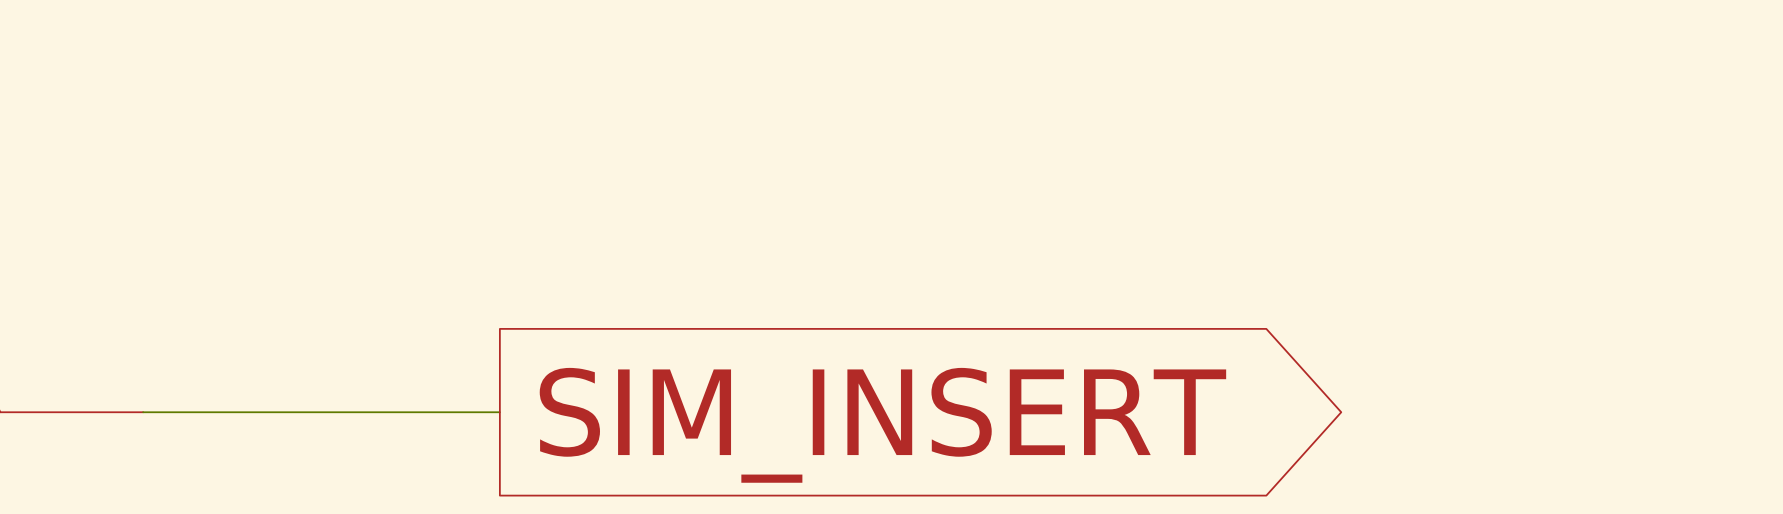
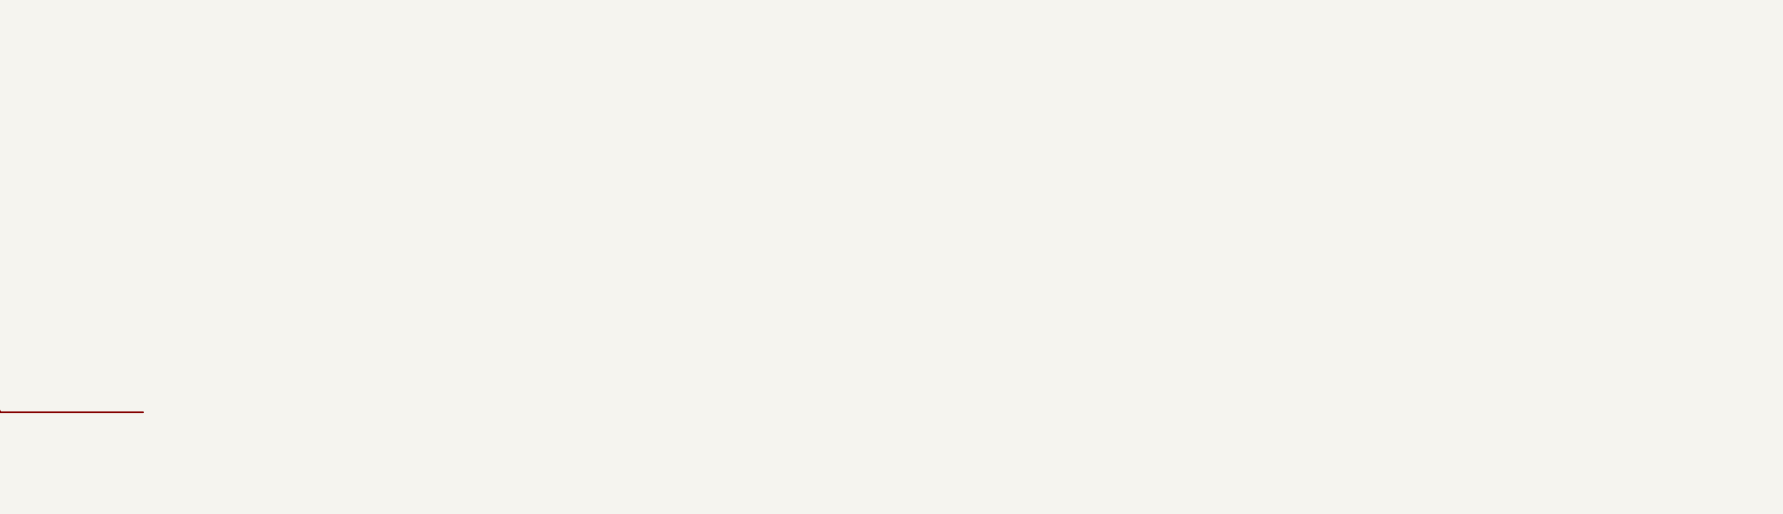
wire: (143, 412) (499, 412) -> none
global label: SIM_INSERT (882, 425) -> none

